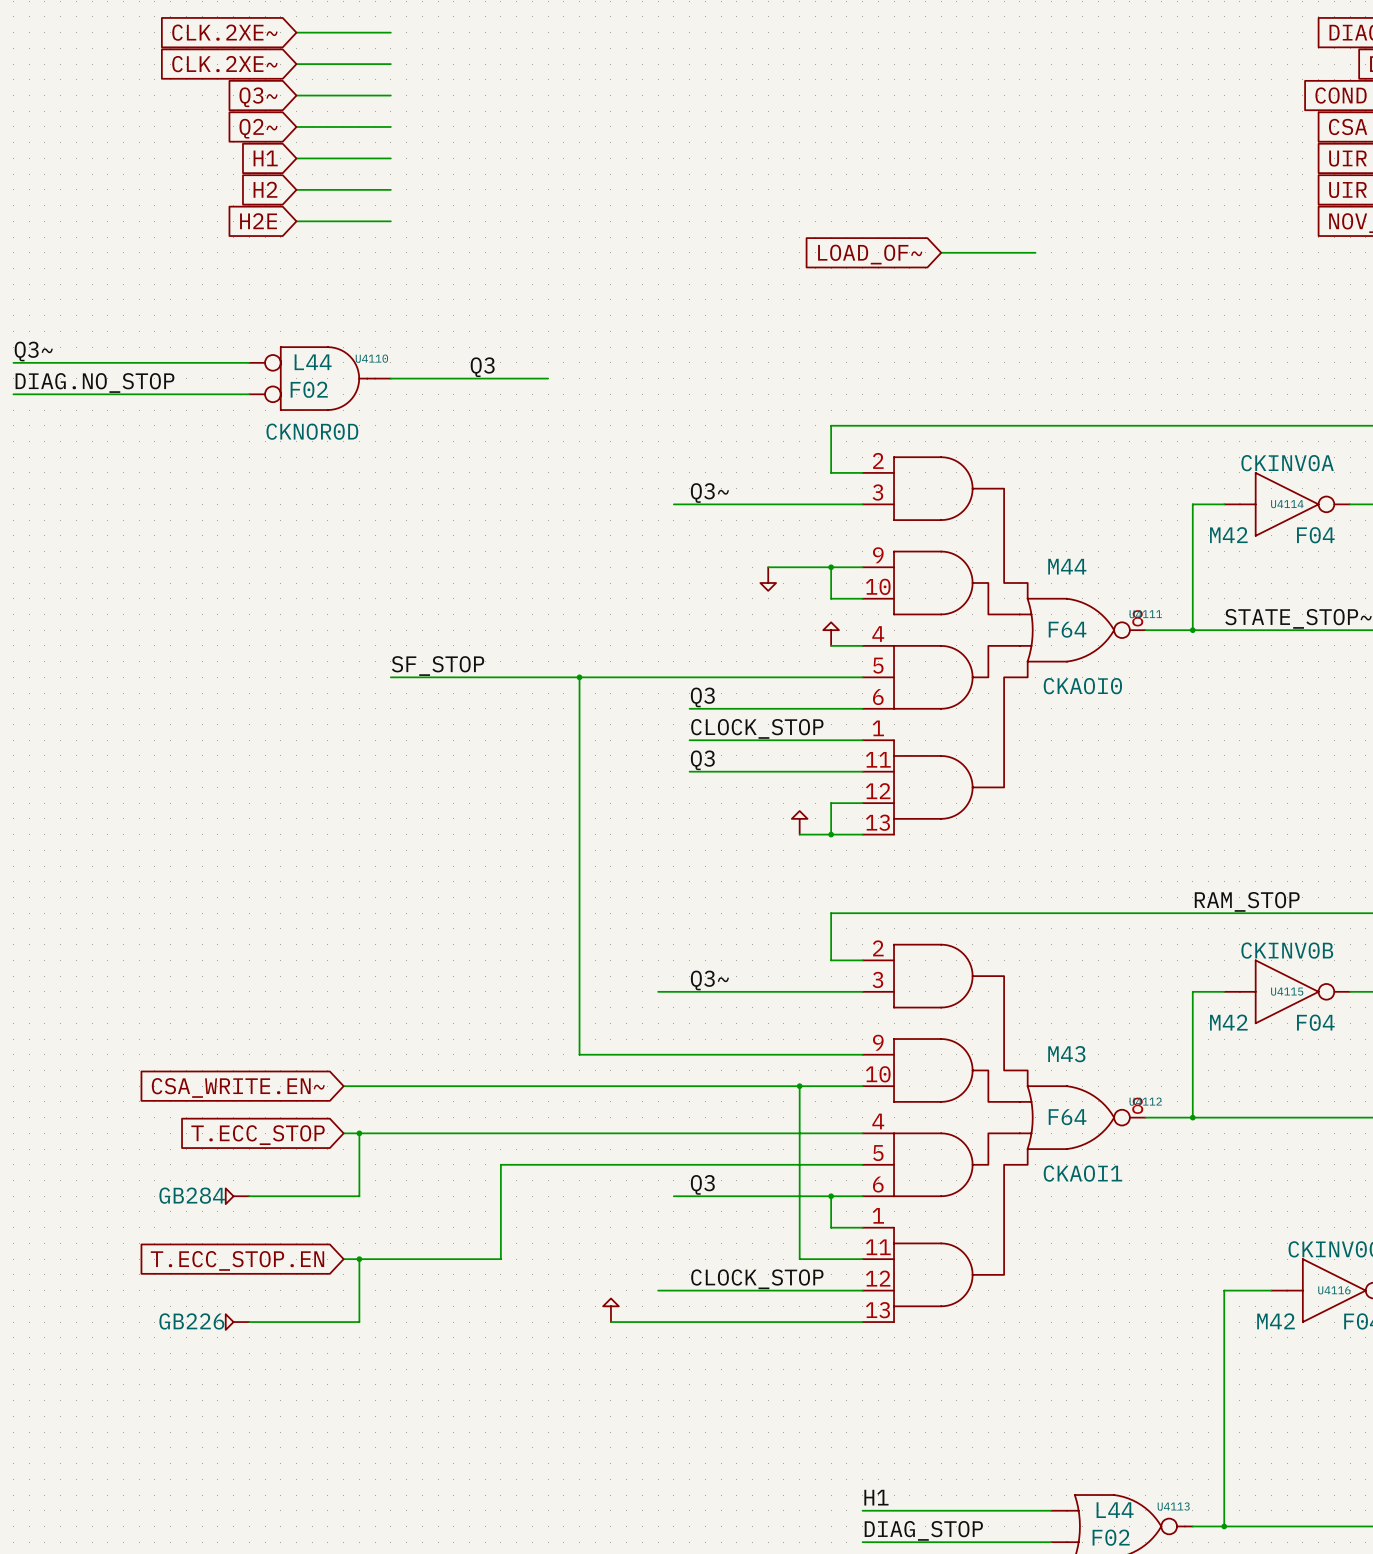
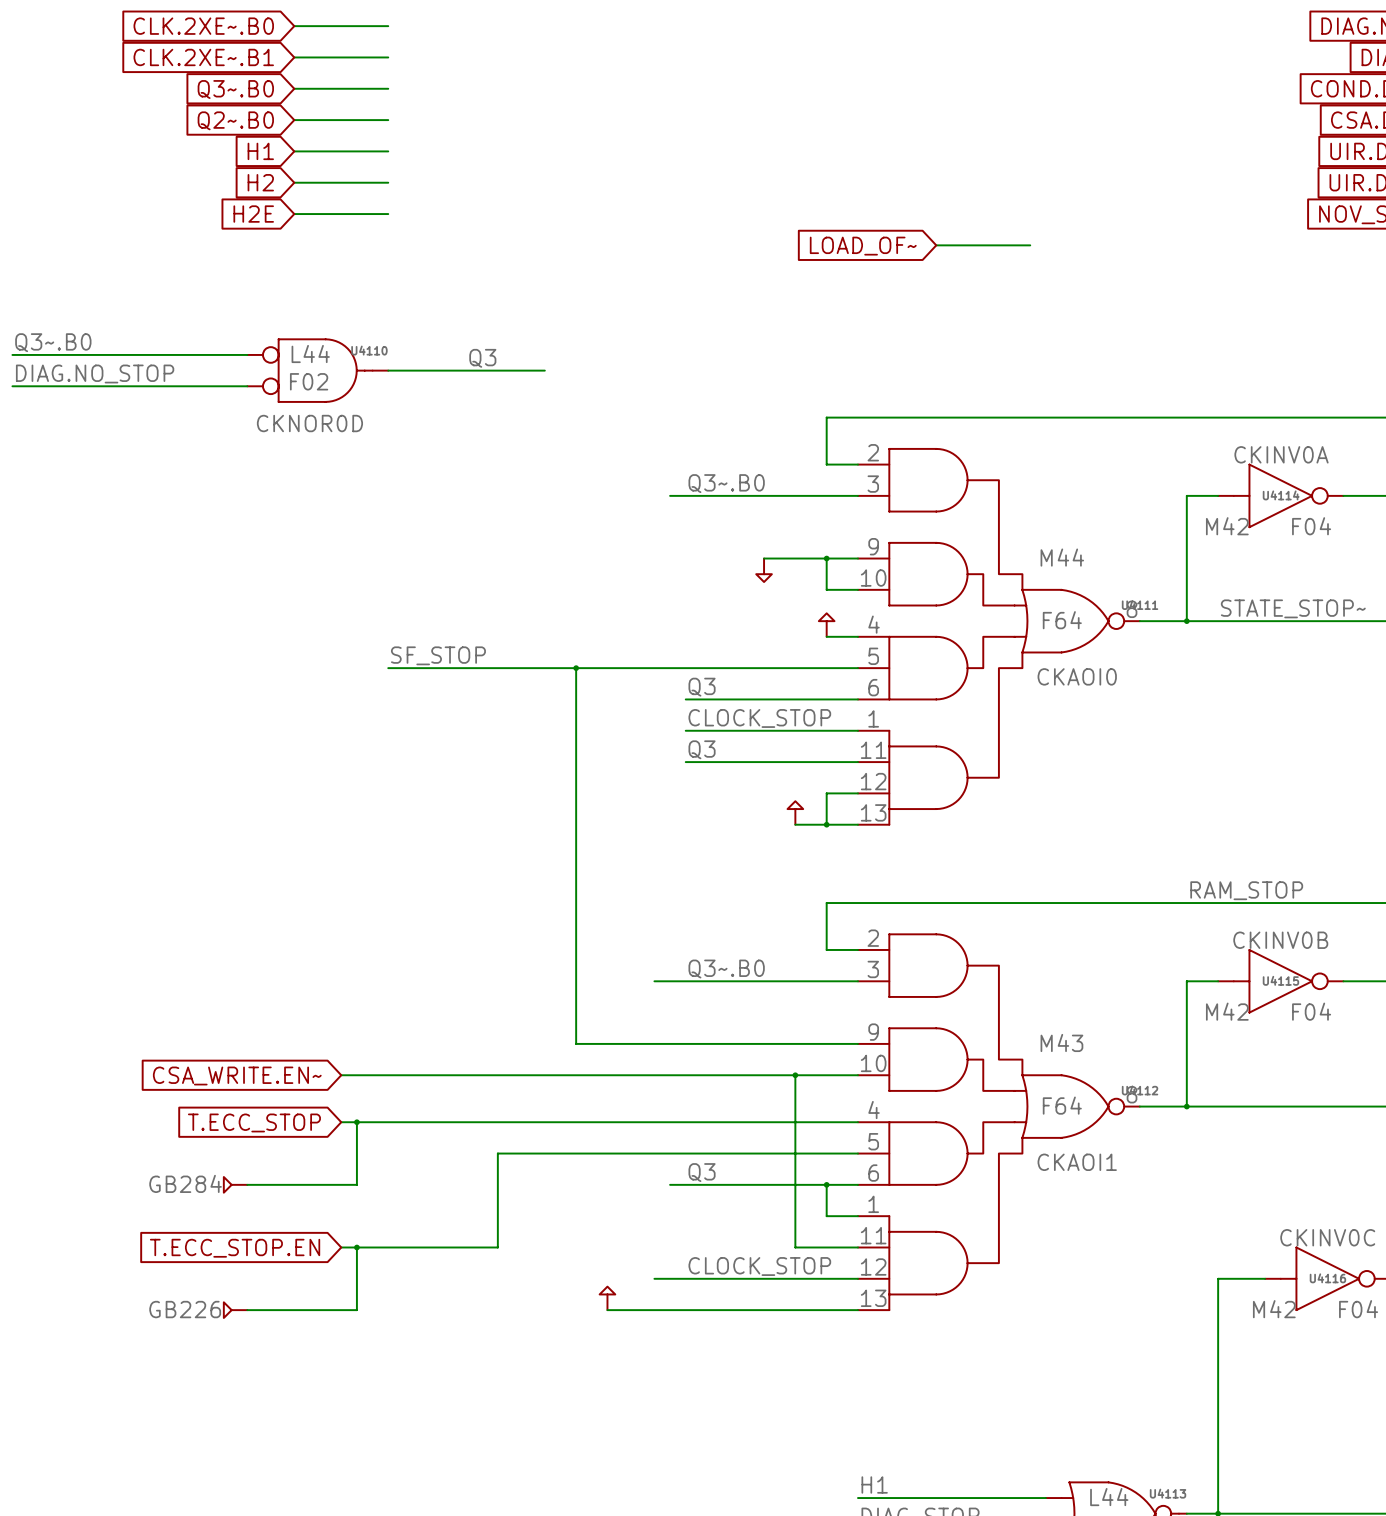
global label: CLK.2XE~ (224, 32) -> CLK.2XE~.B0 (203, 26)
global label: CLK.2XE~ (224, 64) -> CLK.2XE~.B1 (203, 57)
global label: Q3~ (258, 97) -> Q3~.B0 (235, 89)
global label: Q2~ (258, 128) -> Q2~.B0 (235, 120)
label: Q3~ (33, 351) -> Q3~.B0 (53, 342)
label: Q3~ (709, 493) -> Q3~.B0 (726, 483)
label: Q3~ (709, 980) -> Q3~.B0 (726, 969)

